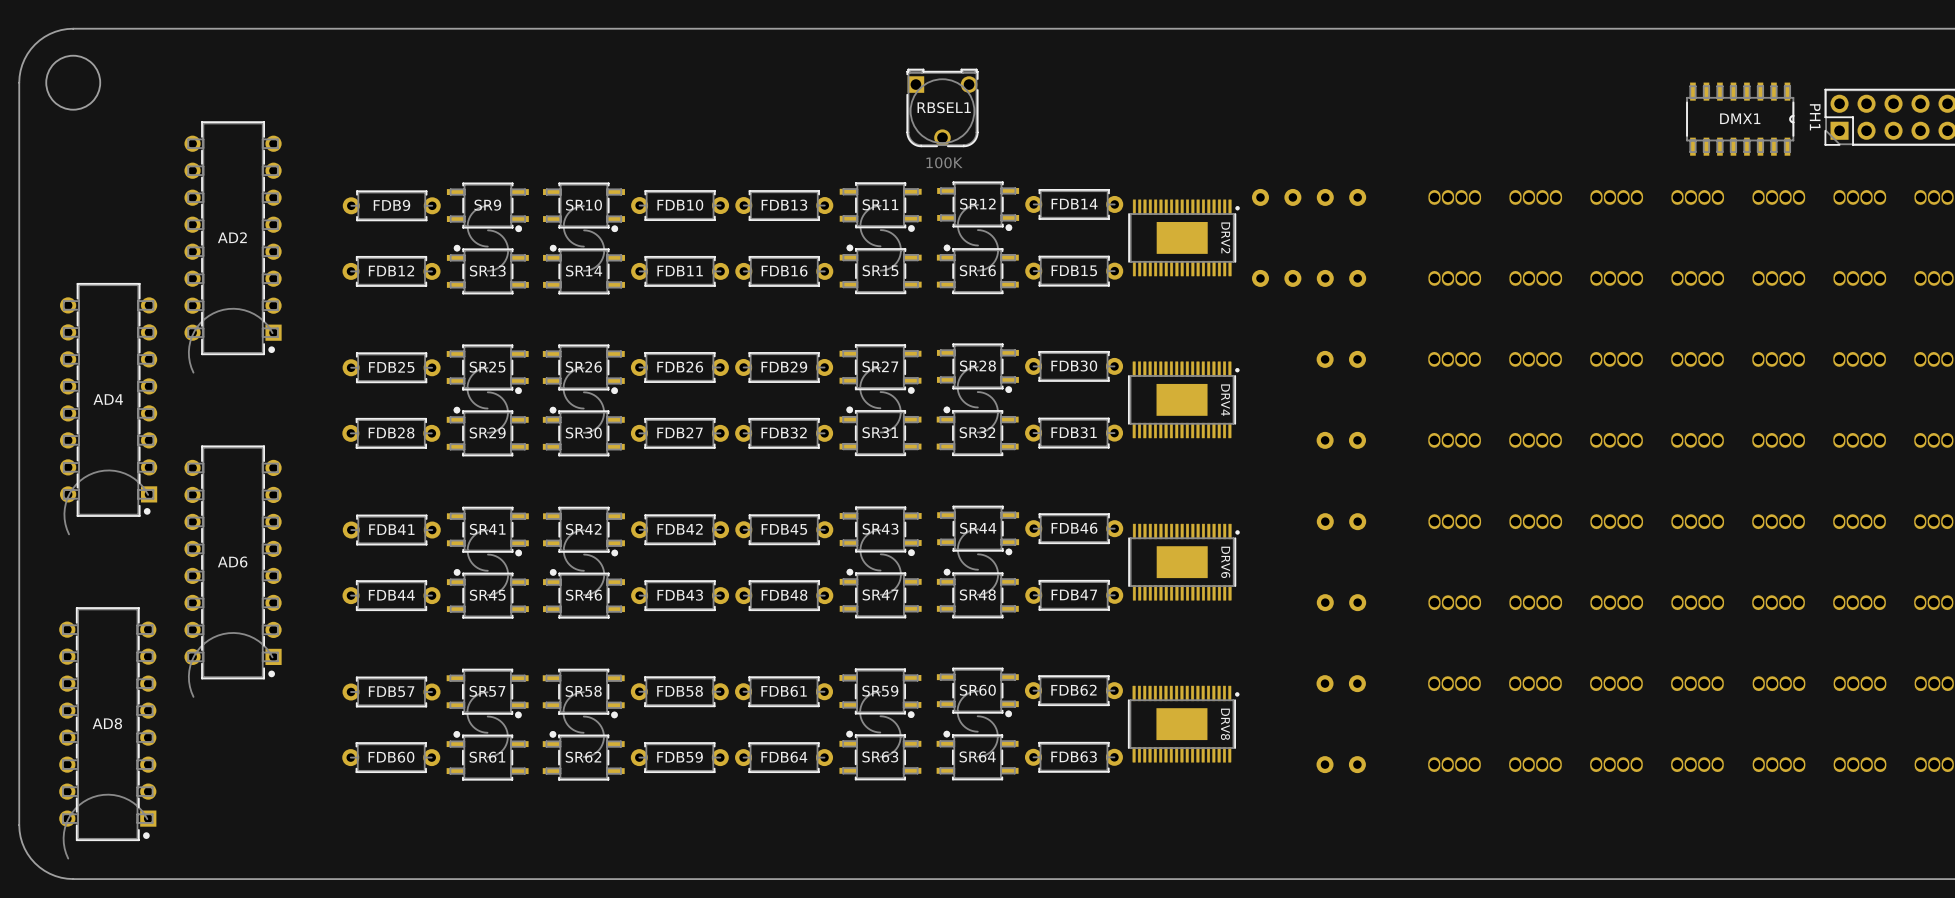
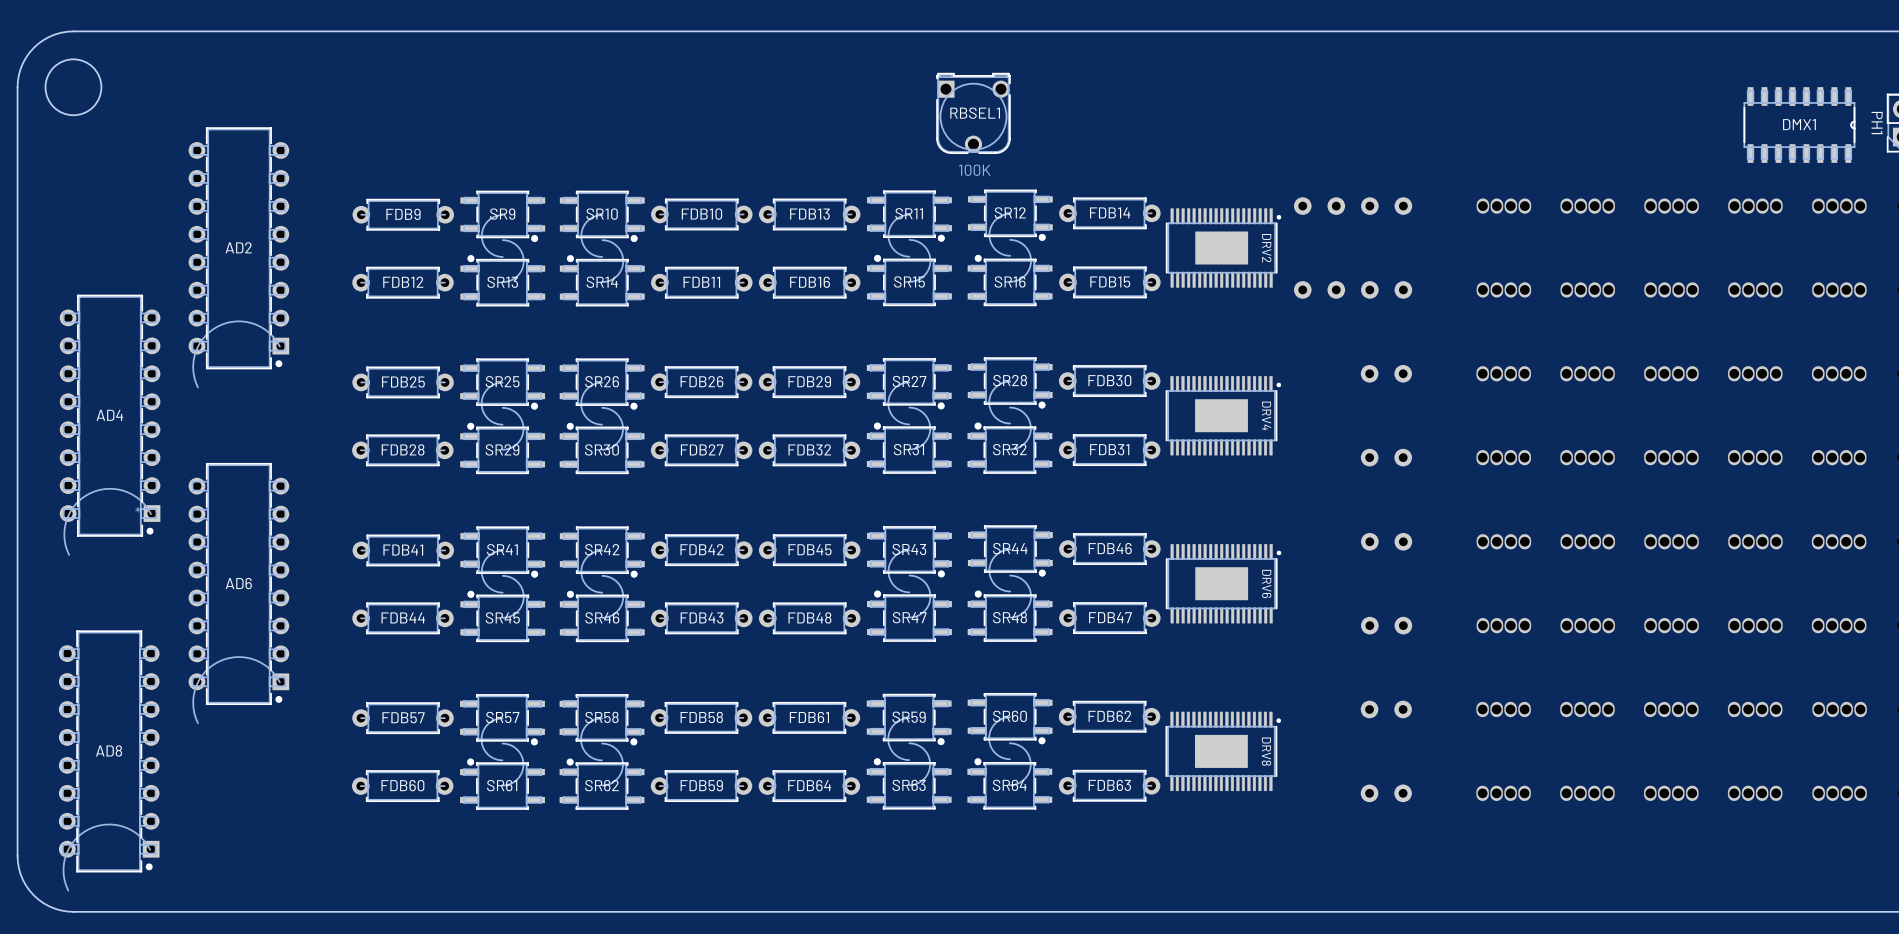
AD4 text: none -> * (138, 509)

